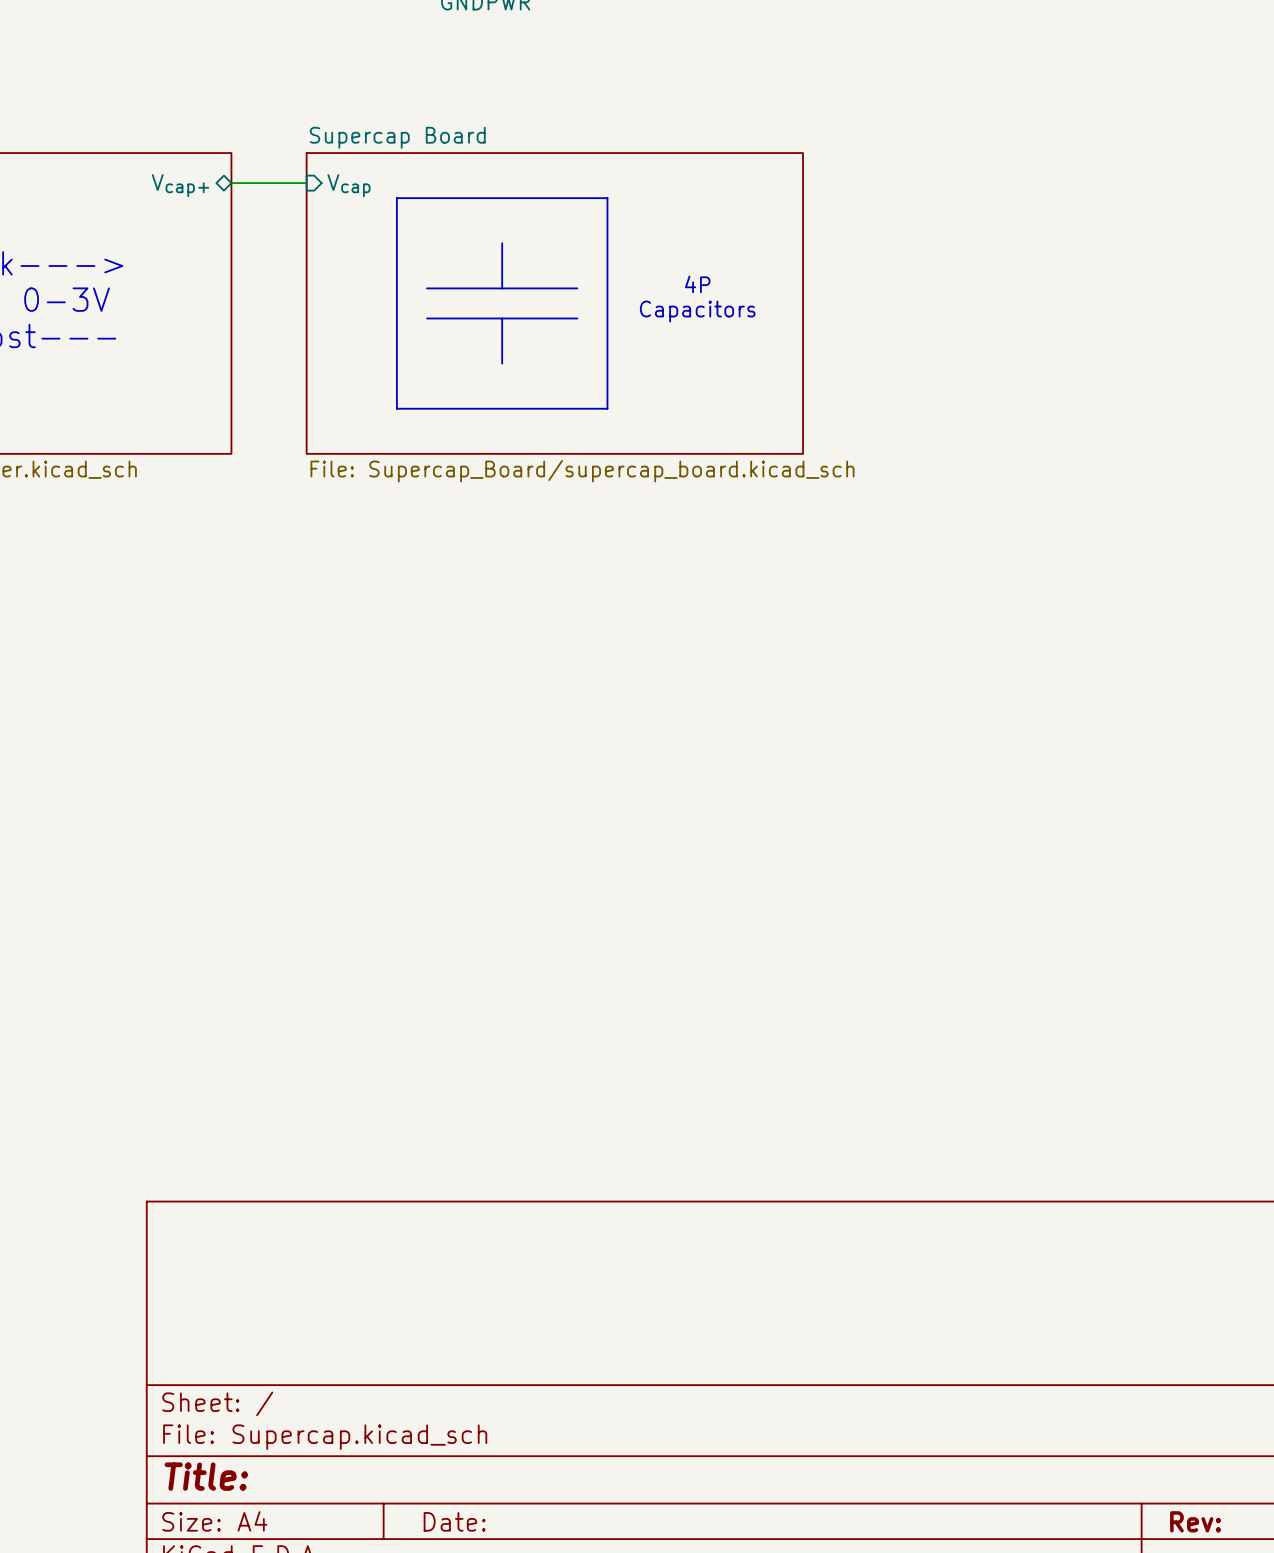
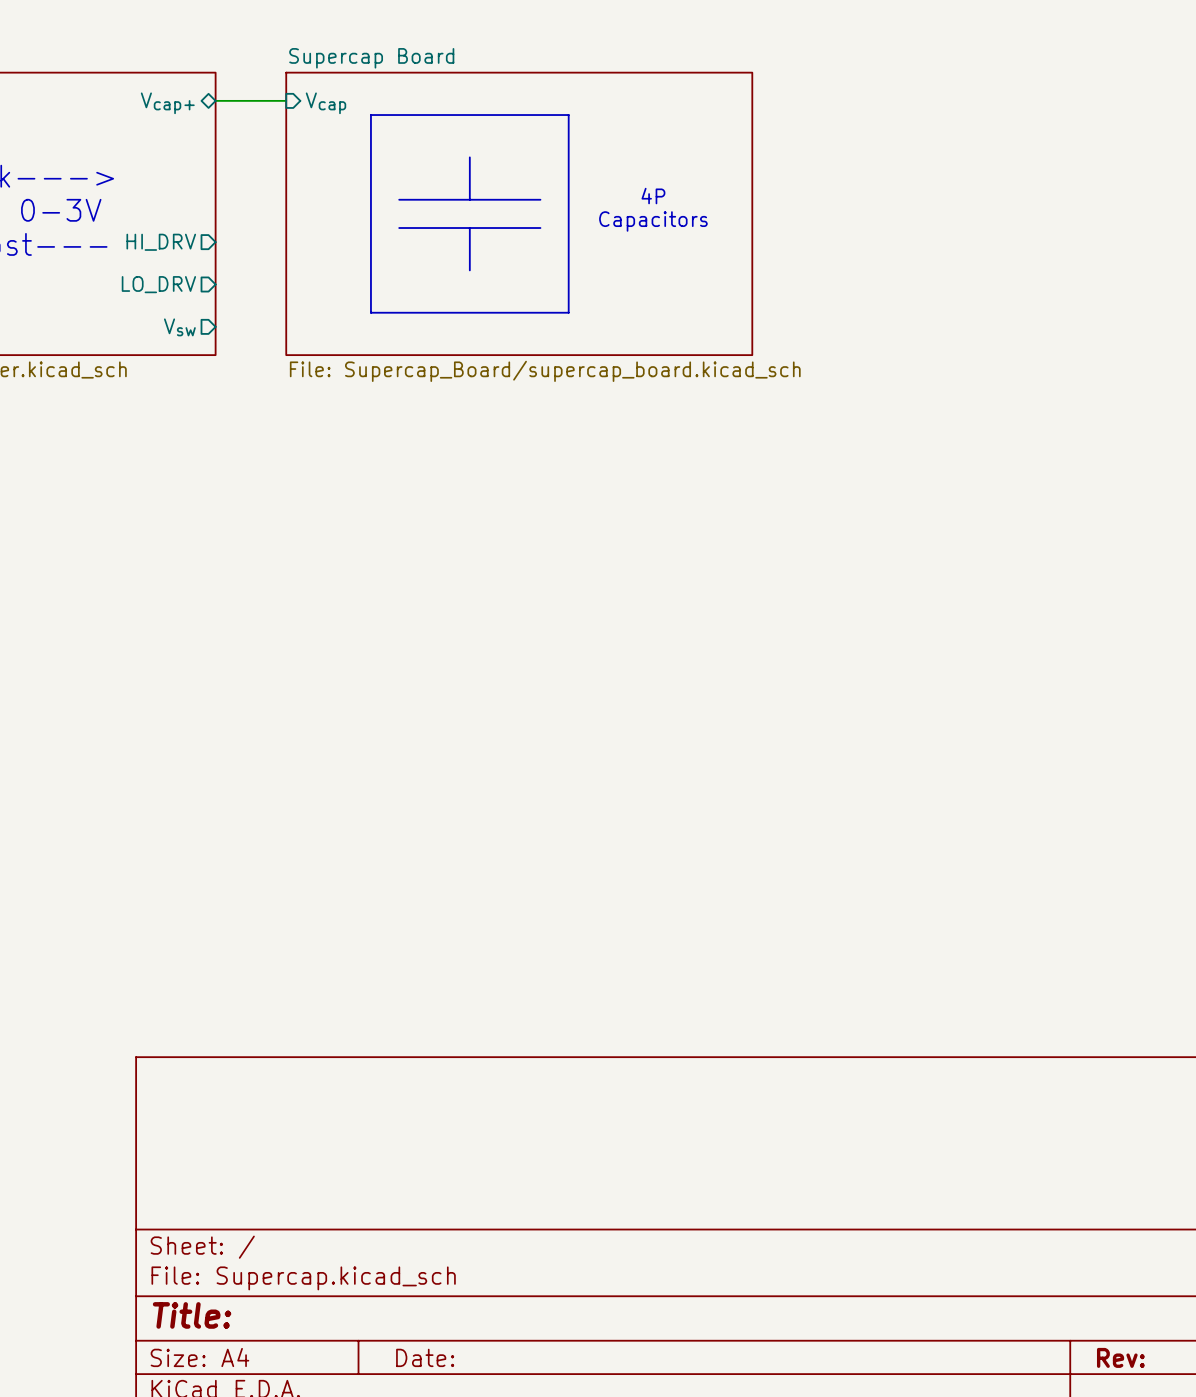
sheet pin: none -> HI_DRV (161, 242)
sheet pin: none -> LO_DRV (158, 284)
sheet pin: none -> Vsw (179, 327)

